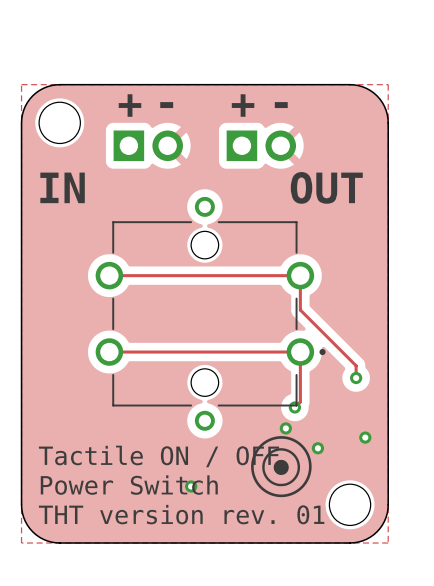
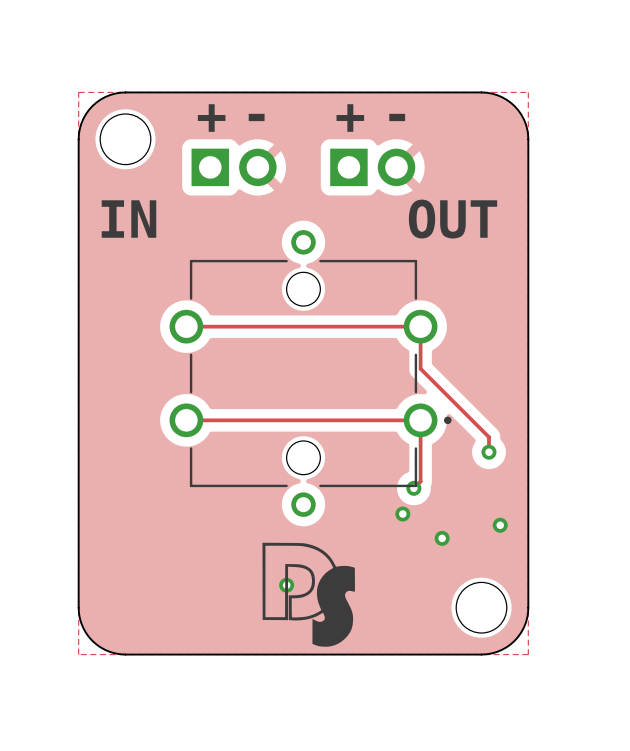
drawing: [251, 436, 312, 498] -> none
drawing: none -> [262, 542, 355, 647]
text: Tactile ON / OFF (159, 456) -> none
text: Power Switch (129, 485) -> none
text: THT version rev. 01 (181, 514) -> none

